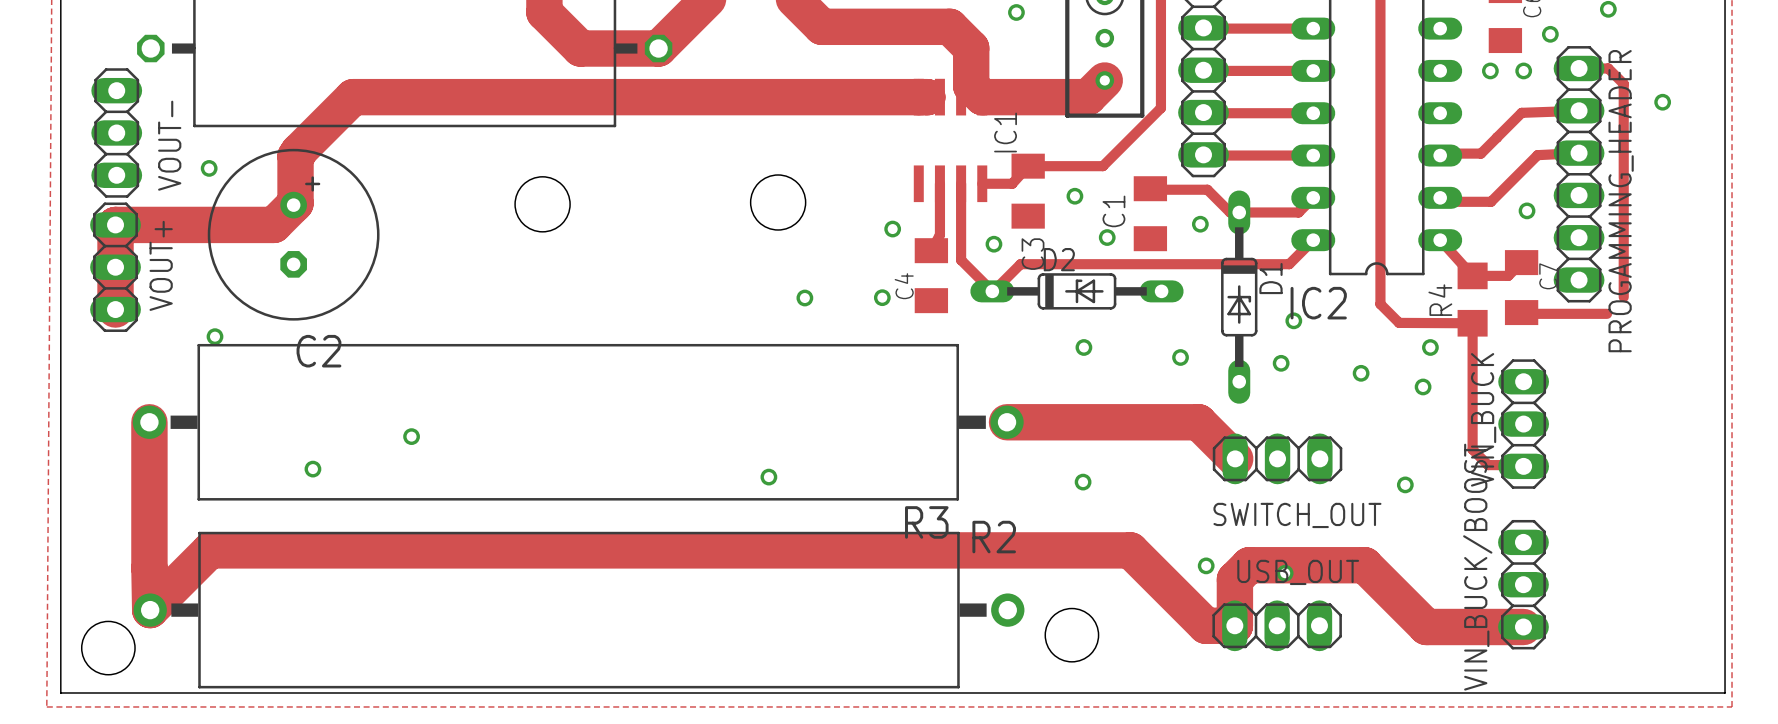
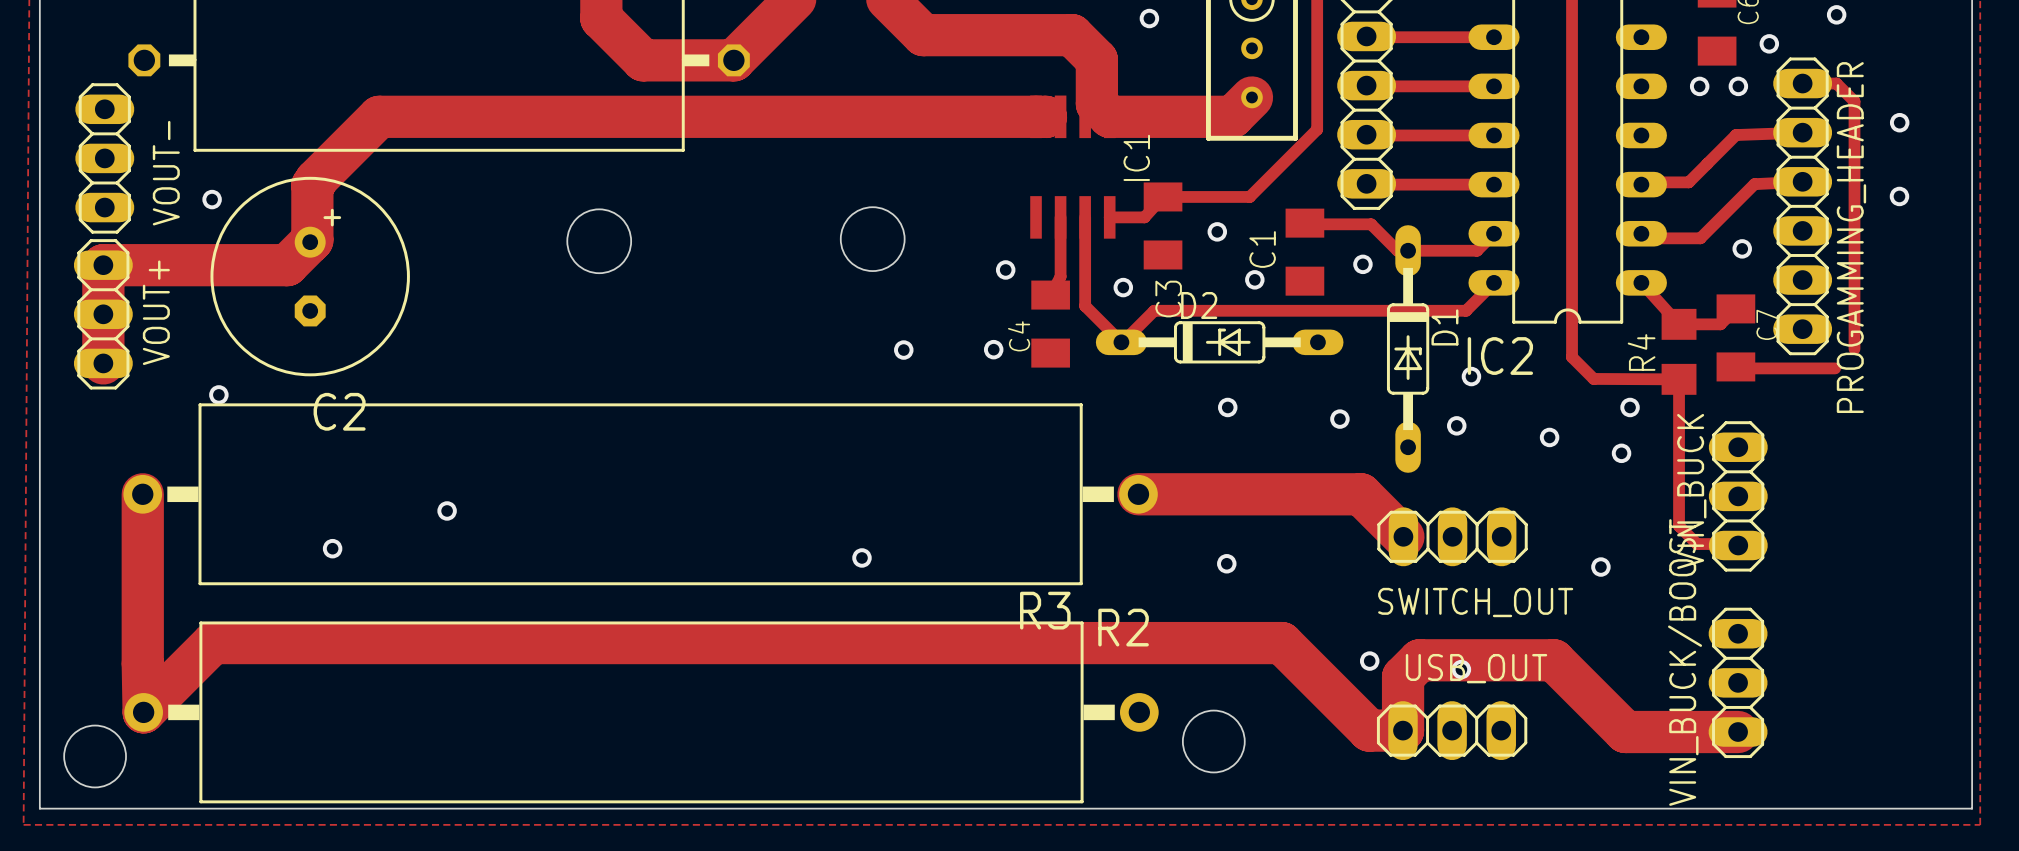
via: none -> (1899, 196)

